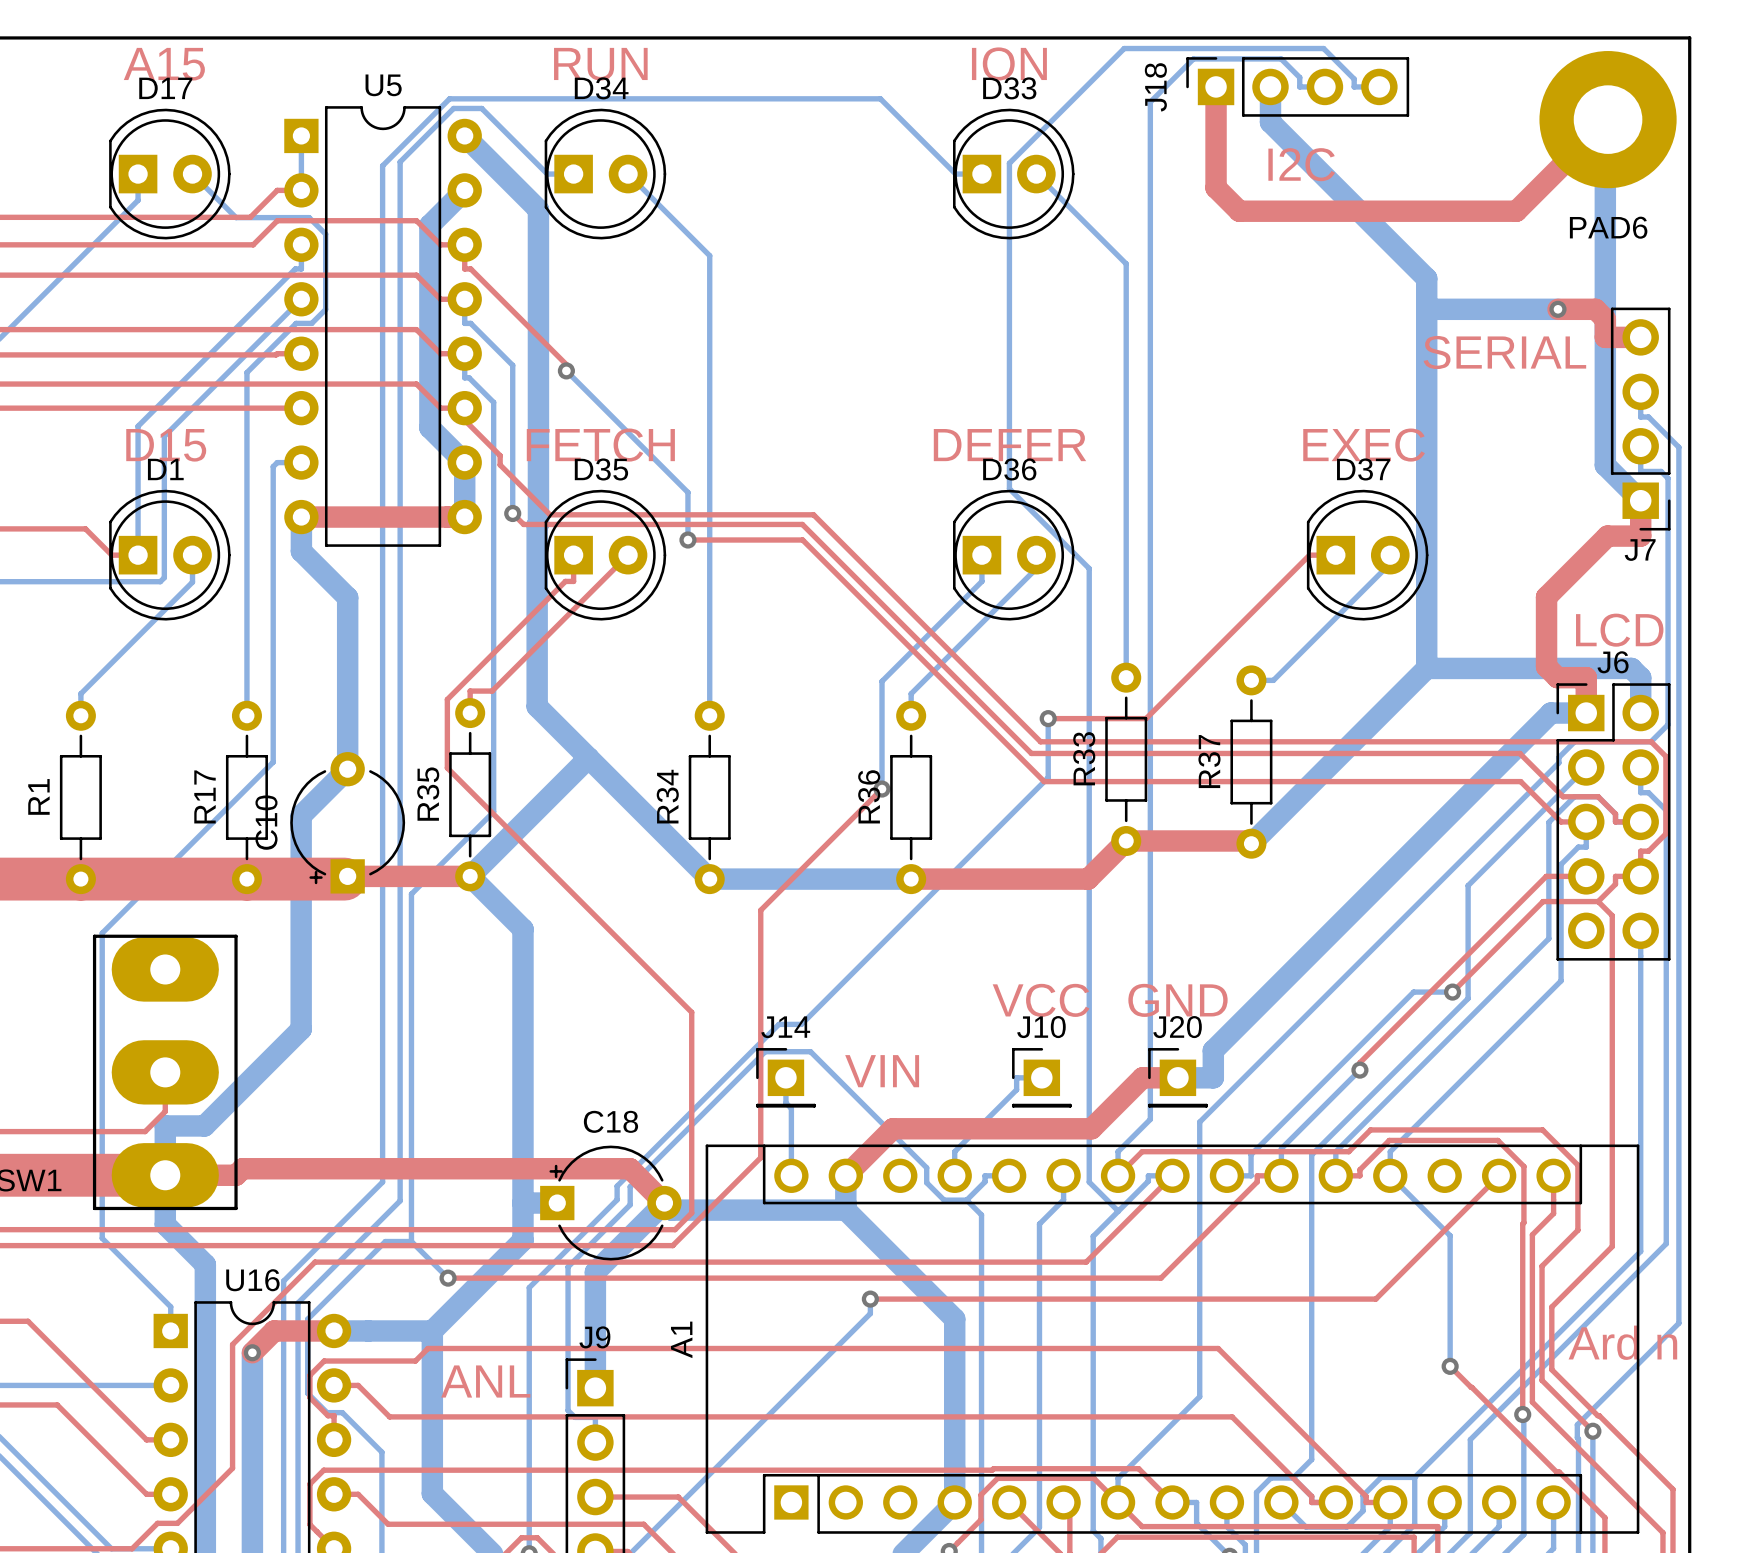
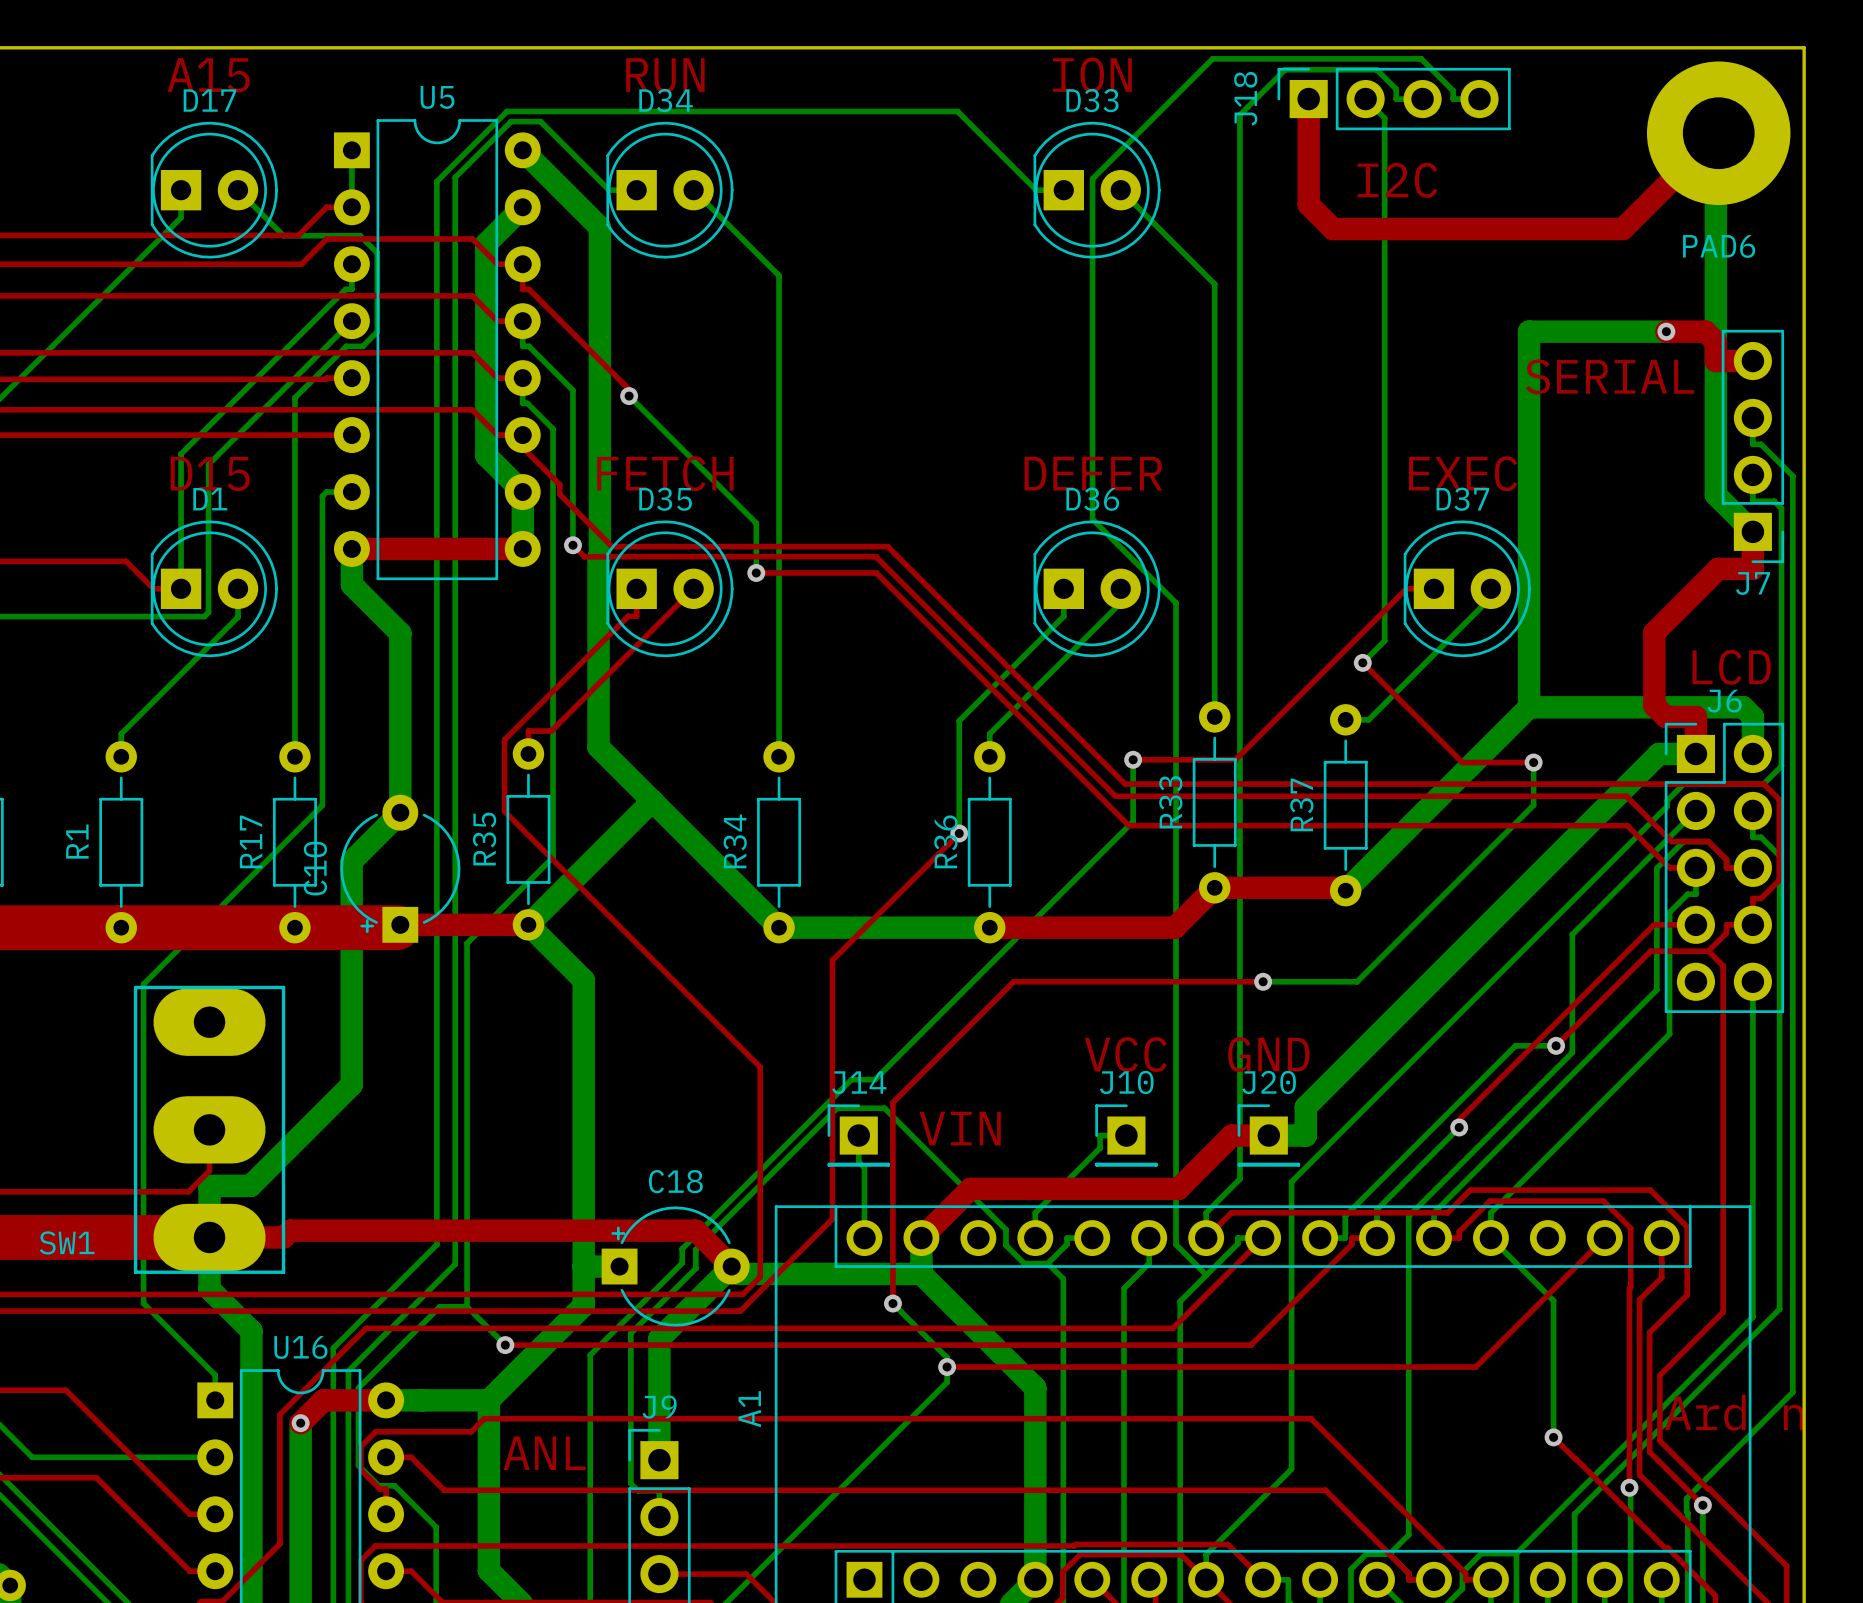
bottom track: (1270, 86) (1270, 122) (1426, 278) (1426, 309) -> (1365, 99) (1384, 118) (1384, 640) (1362, 662)
top track: none -> (1362, 662) (1462, 762) (1533, 762)
via: none -> (1362, 662)
bottom track: none -> (1533, 762) (1533, 805) (1357, 981) (1263, 981)
via: none -> (1533, 762)
top track: none -> (1263, 981) (1013, 981) (892, 1102) (892, 1303)
via: none -> (1263, 981)
bottom track: none -> (892, 1303) (947, 1357) (947, 1367)
via: none -> (892, 1303)

